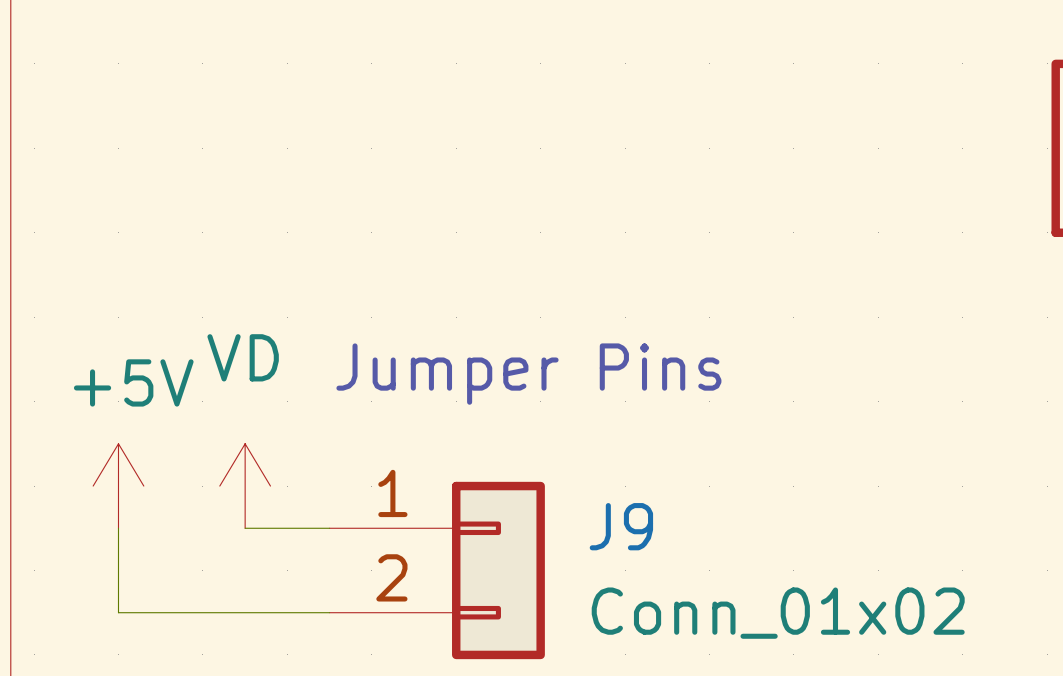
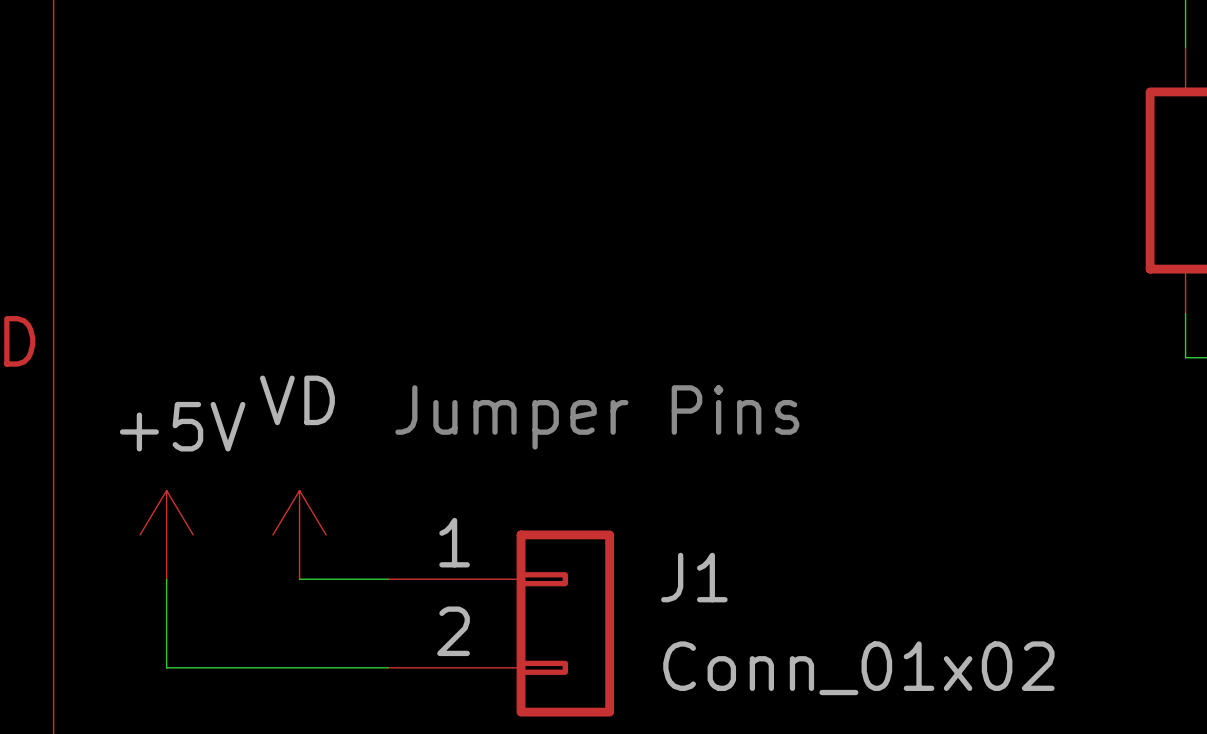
J9 name: J9 (621, 526) -> J1 (694, 577)

